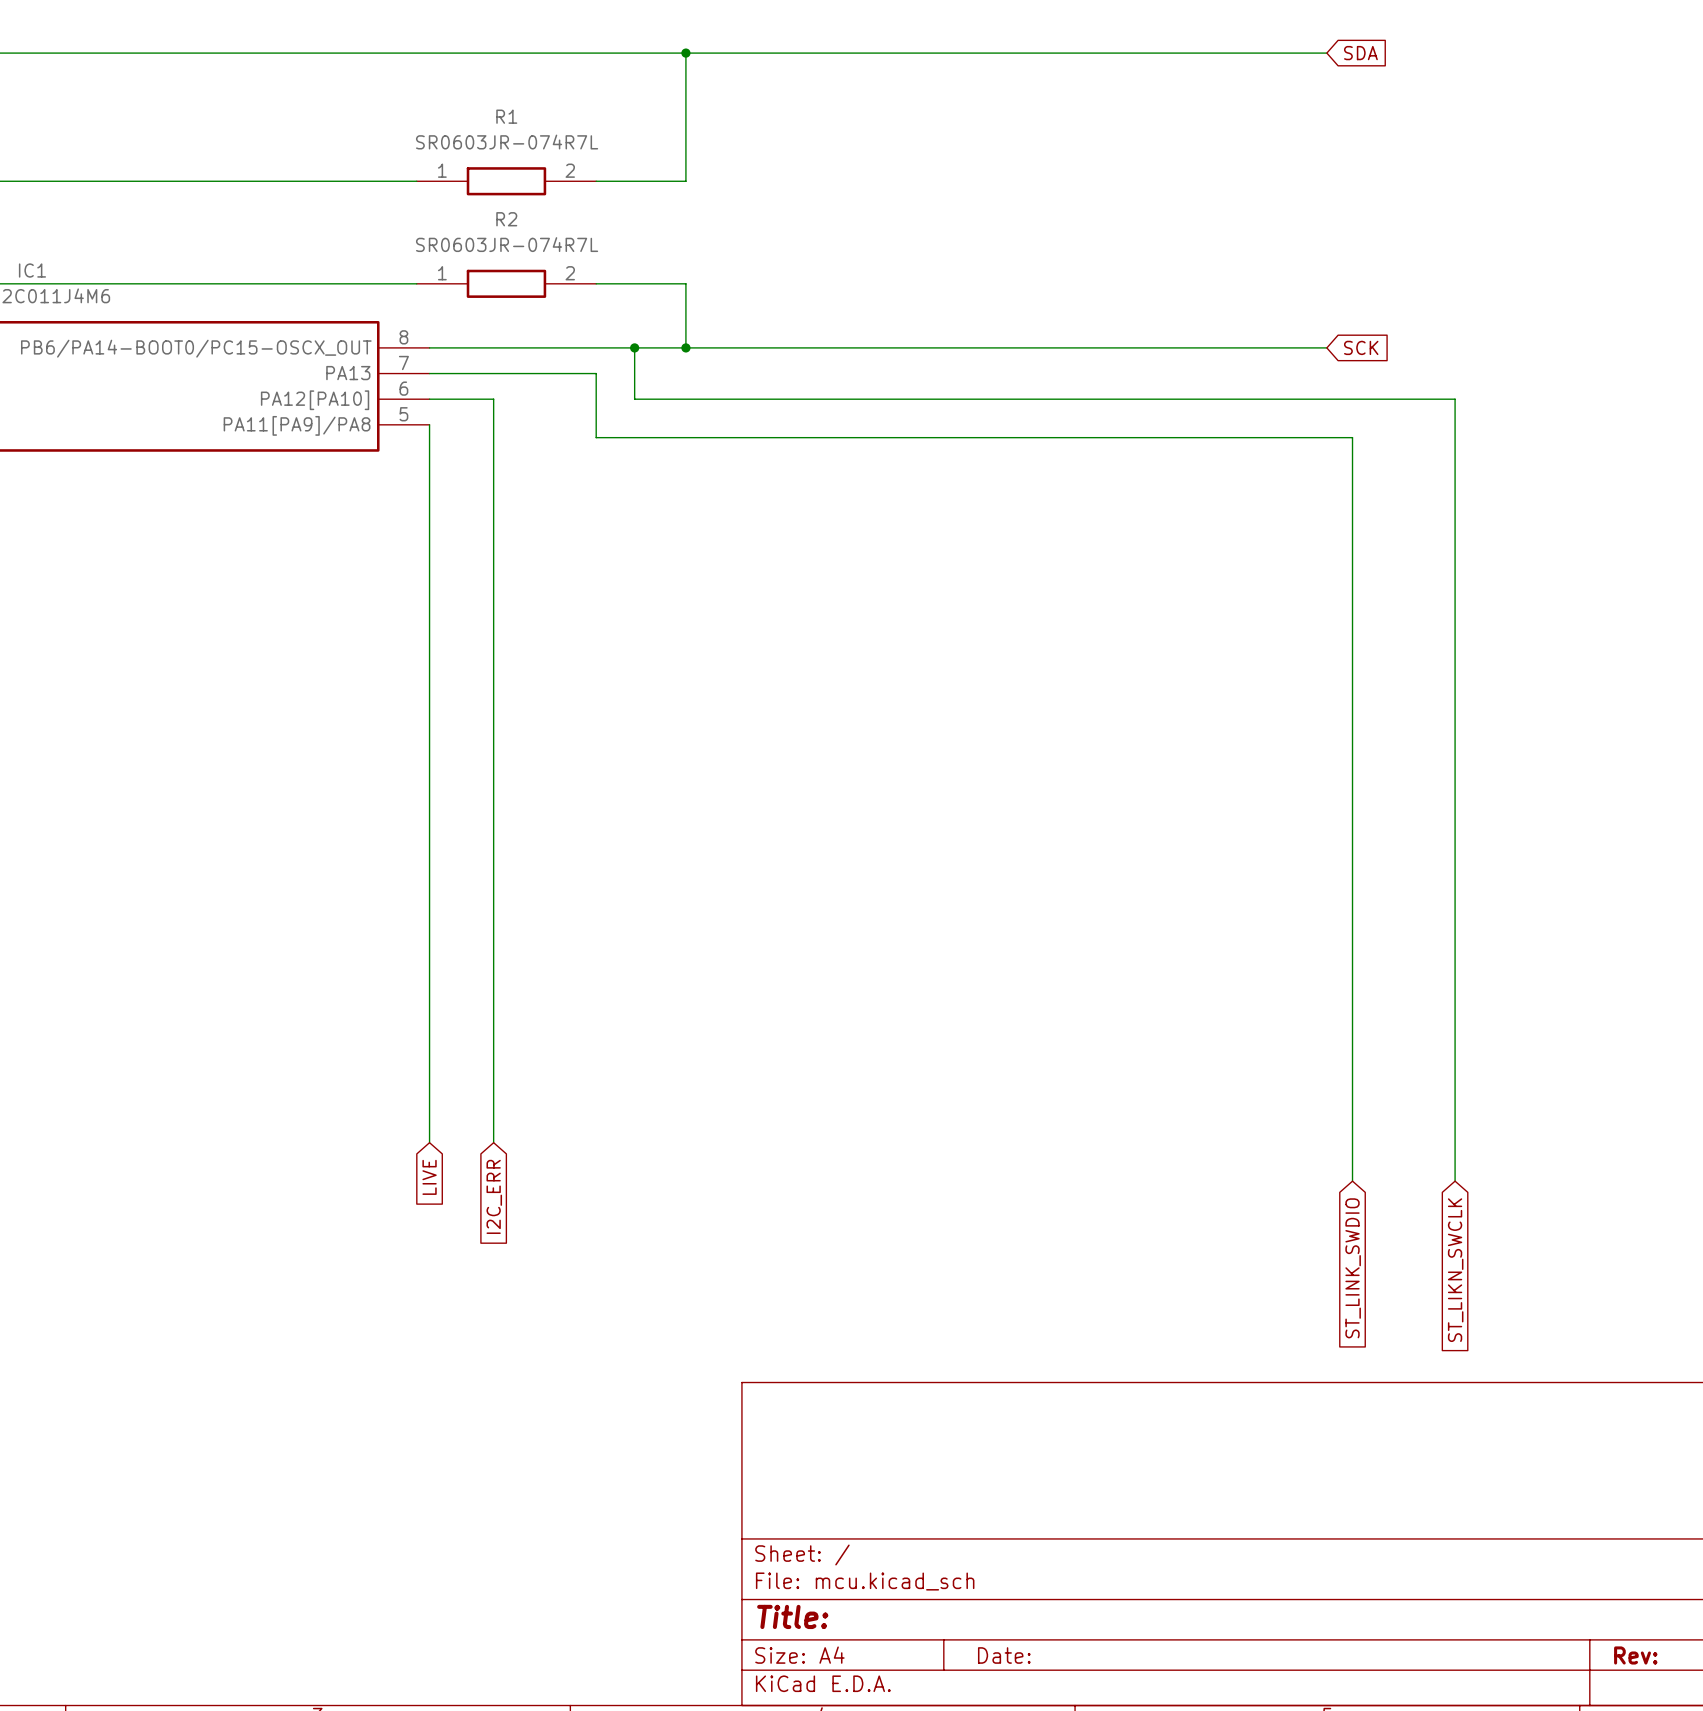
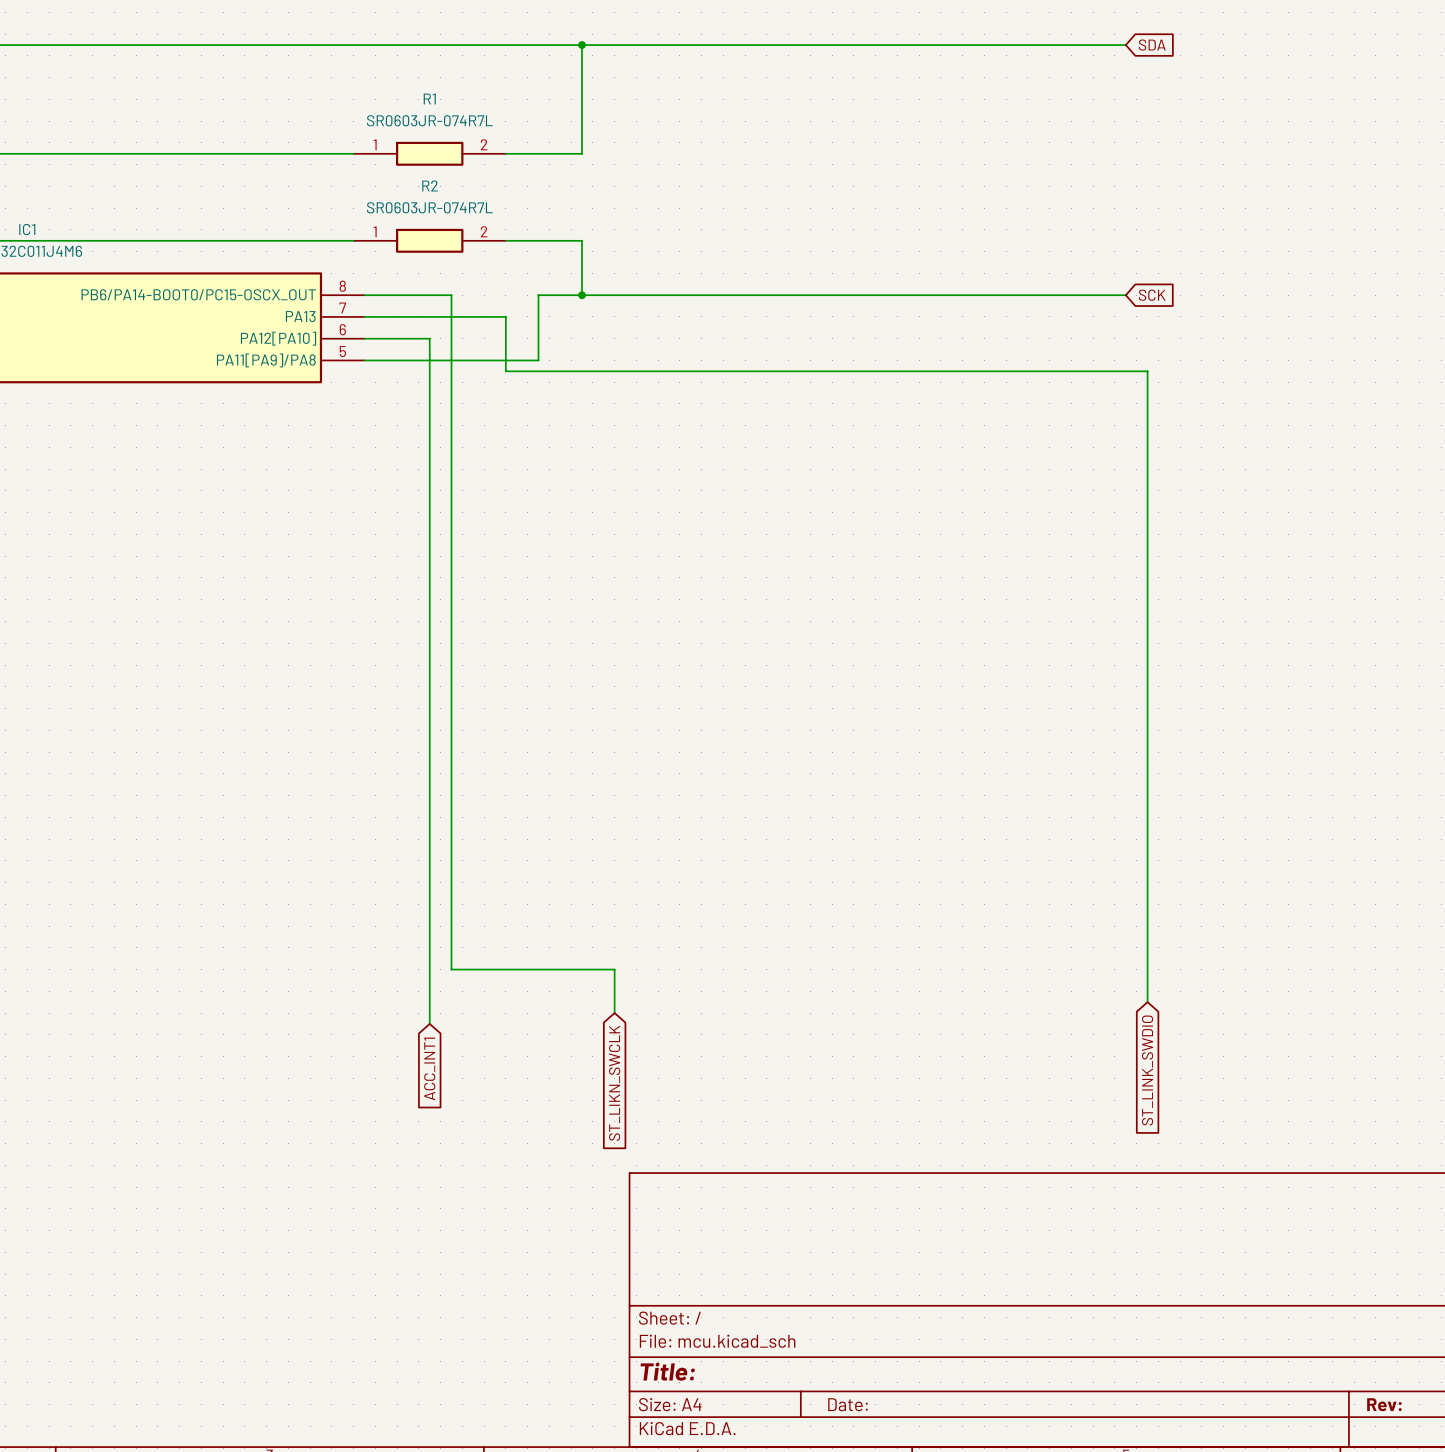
wire: (532, 347) (634, 347) -> (451, 295) (451, 969) (614, 969) (614, 1013)
junction: (634, 347) -> none
wire: (493, 399) (493, 1142) -> (418, 338) (429, 338) (429, 1023)
wire: (634, 399) (1455, 399) (1455, 1181) -> none
wire: (429, 424) (429, 1142) -> (364, 360) (538, 360) (538, 338)
global label: LIVE (429, 1177) -> none
global label: I2C_ERR (494, 1196) -> none
global label: none -> ACC_INT1 (429, 1068)
global label: ST_LIKN_SWCLK (1455, 1270) -> none
global label: none -> ST_LIKN_SWCLK (614, 1083)

